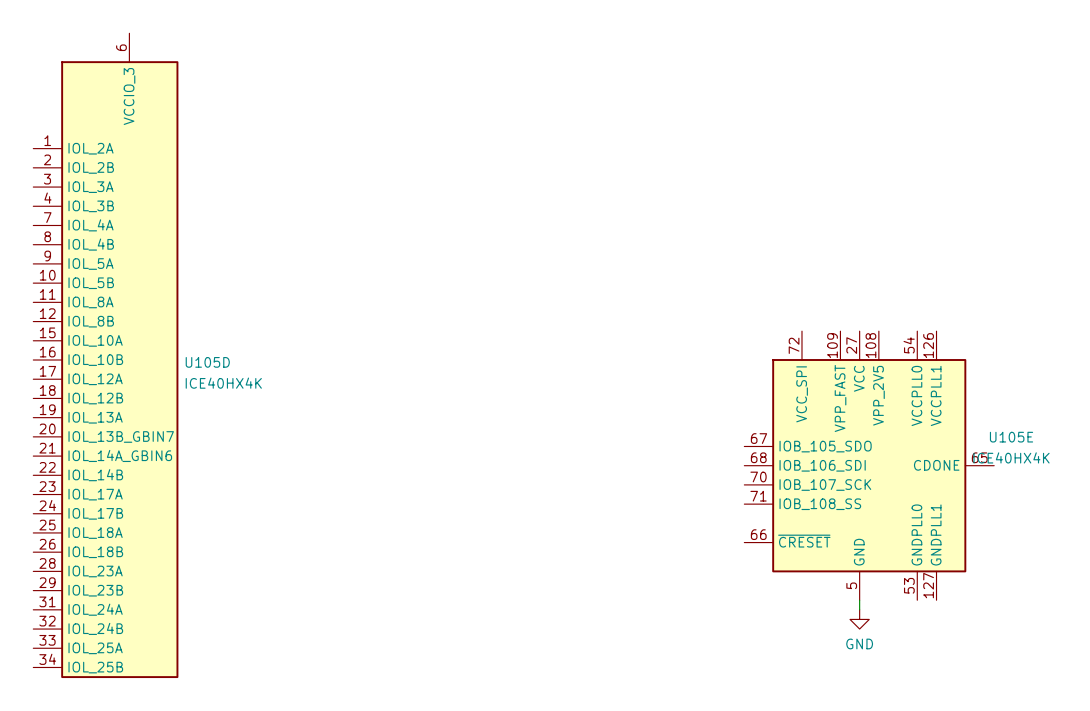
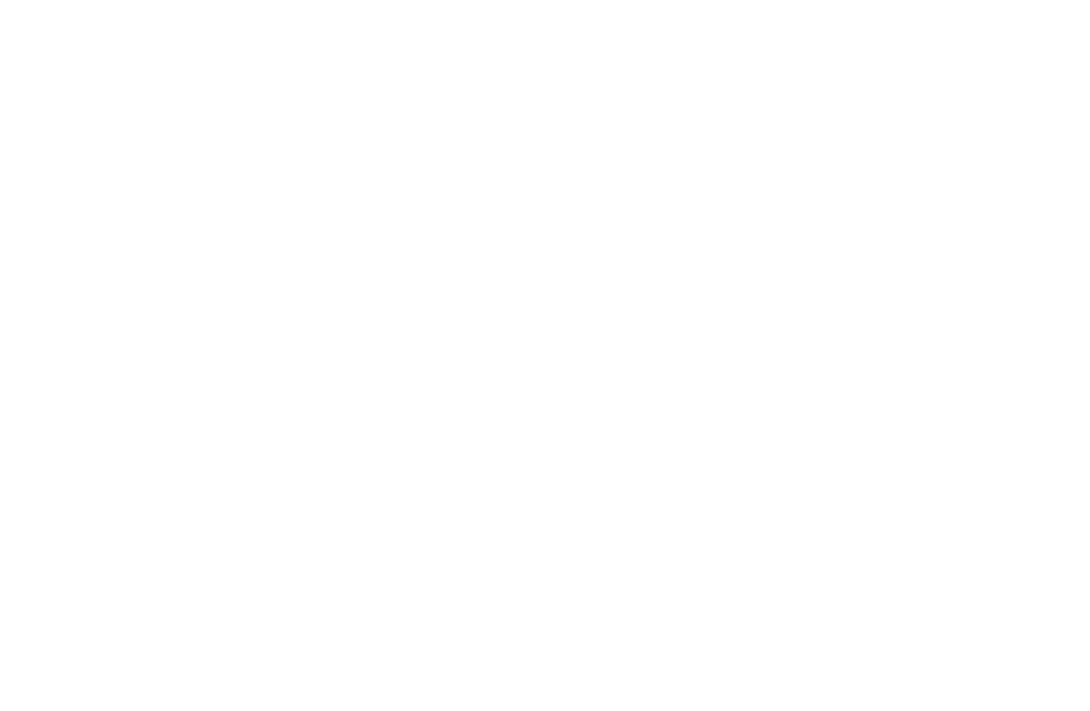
U105D: ICE40HX4K (105, 355) -> none
U105E: ICE40HX4K (869, 465) -> none
wire: (859, 600) (859, 609) -> none
power symbol: GND (859, 619) -> none

